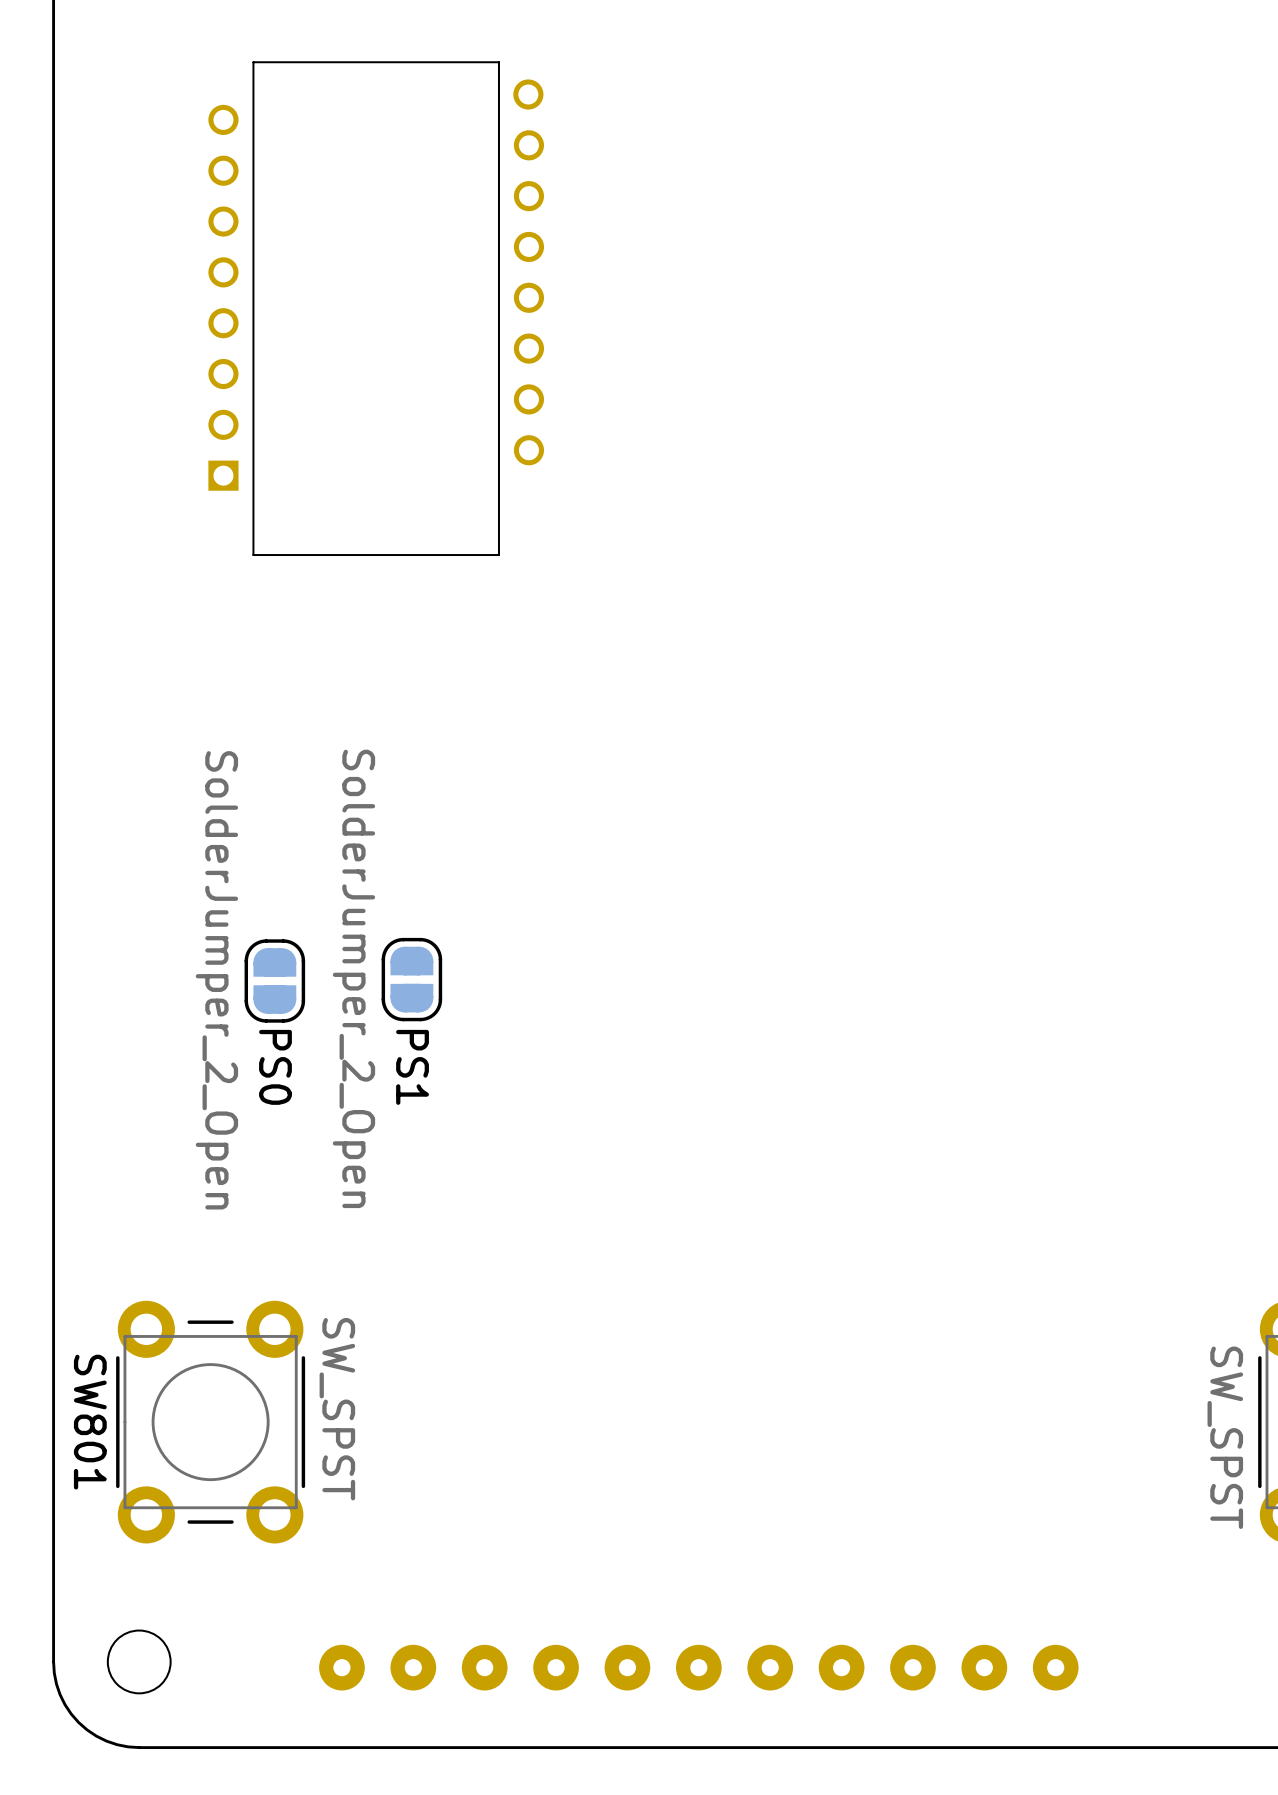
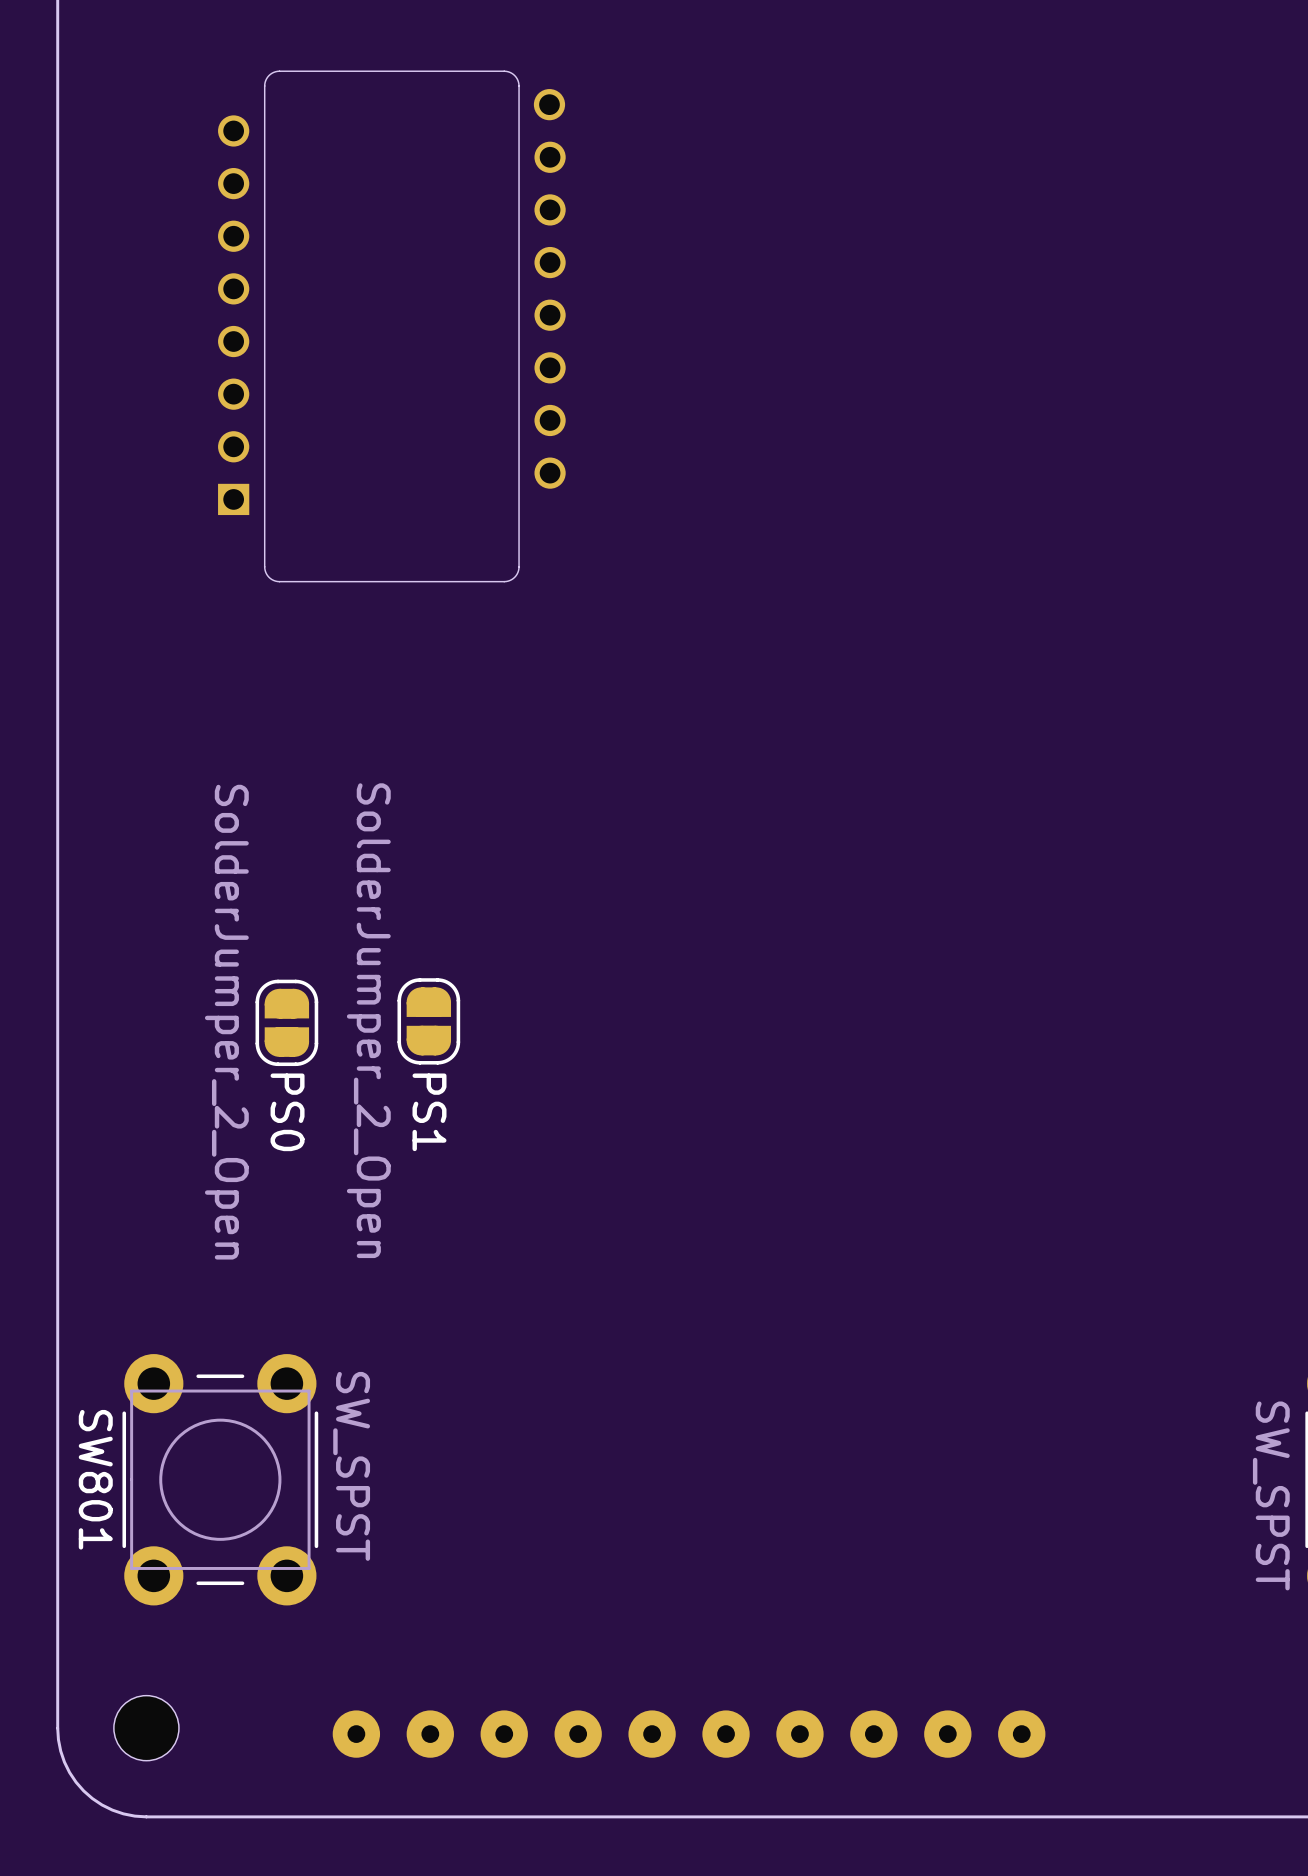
part footprint: [208, 61, 545, 556] -> [218, 70, 566, 583]
part: (698, 1667) -> none

